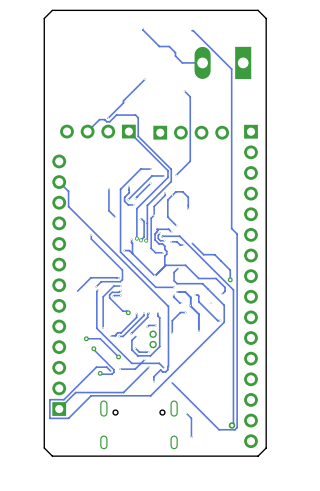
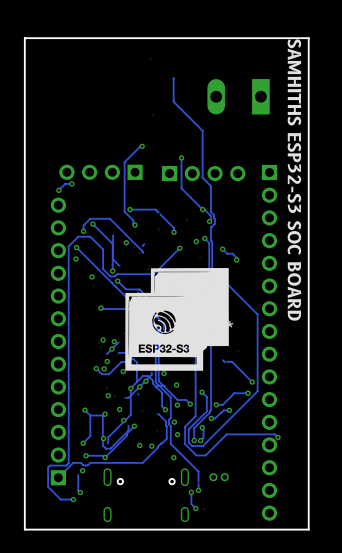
track: (142, 28) (159, 46) (169, 46) (182, 62) (202, 62) -> none
track: (191, 30) (231, 69) (231, 228) (237, 233) (237, 427) (234, 429) (219, 429) (172, 382) -> none
track: (144, 79) (108, 118) -> none
track: (184, 91) (190, 96) -> (173, 78) (173, 101) (202, 130) (202, 134)
via: (184, 91) -> none
track: none -> (142, 146) (124, 162) (124, 211) (135, 225)
via: none -> (142, 146)
via: (108, 118) -> none
track: none -> (181, 157) (181, 188) (211, 216) (209, 221)
via: none -> (181, 157)
track: (87, 131) (99, 119) (109, 121) (116, 115) (135, 115) (138, 117) (138, 136) (171, 169) (171, 181) (147, 205) (146, 240) -> none
track: (128, 131) (167, 170) (167, 177) (136, 208) (136, 238) -> none
track: (190, 136) (190, 161) (176, 175) -> (202, 177) (211, 186) (211, 211) (214, 219) (214, 223) (211, 226) (212, 276) (214, 279) (214, 283) (211, 286) (211, 299) (214, 302) (214, 306) (211, 312) (211, 410) (194, 428) (194, 440)
text: none -> SAMHITHS ESP32-S3 SOC BOARD (294, 179)
track: none -> (71, 183) (65, 183) (58, 190)
via: none -> (71, 183)
via: none -> (58, 190)
track: none -> (130, 209) (155, 209) (174, 228) (174, 232)
via: none -> (130, 209)
via: none -> (202, 209)
track: (151, 169) (140, 169) (120, 189) (120, 252) (155, 287) (174, 287) -> none
track: (164, 175) (151, 175) (128, 199) -> none
via: (164, 175) -> none
via: none -> (209, 221)
track: none -> (93, 224) (112, 243) (112, 271)
via: none -> (93, 224)
via: none -> (135, 225)
track: (59, 182) (68, 191) (68, 198) -> (179, 248) (153, 274) (117, 274) (110, 276) (103, 269) (103, 249) (90, 236) (78, 236) (68, 246)
track: (150, 183) (137, 196) -> none
track: none -> (83, 231) (83, 225) (90, 218) (109, 218) (142, 253)
via: none -> (83, 231)
track: (129, 186) (129, 192) (124, 197) (124, 201) (128, 204) (133, 204) -> none
via: none -> (174, 232)
track: none -> (204, 238) (209, 242) (209, 281)
via: none -> (204, 238)
track: (165, 192) (154, 206) (154, 215) (151, 218) (151, 248) (155, 252) (163, 252) -> none
via: (165, 192) -> none
via: none -> (196, 241)
via: none -> (126, 242)
via: (172, 195) -> none
via: (135, 198) -> none
via: none -> (76, 247)
via: none -> (179, 248)
track: none -> (222, 249) (227, 253) (232, 253) (236, 259)
via: none -> (222, 249)
track: (68, 206) (168, 306) (167, 369) (165, 371) (160, 369) (153, 376) (153, 381) -> (68, 254) (68, 463) (66, 465) (49, 465) (48, 467)
track: (188, 209) (188, 197) (182, 191) (175, 191) (167, 199) (167, 217) (176, 225) -> none
via: none -> (76, 259)
via: none -> (236, 259)
via: (154, 215) -> none
track: (140, 219) (144, 221) (144, 237) (140, 240) -> none
via: none -> (112, 271)
via: none -> (92, 276)
track: none -> (220, 280) (225, 282) (257, 314) (257, 391) (202, 446) (192, 446) (188, 442) (188, 429) (206, 411) (206, 397) (202, 392)
track: none -> (117, 281) (126, 289) (139, 289) (151, 301) (151, 311) (163, 324) (163, 331) (158, 336) (158, 381) (177, 400) (186, 400) (190, 404)
via: none -> (117, 281)
track: (171, 232) (168, 229) (157, 229) (155, 234) (155, 239) (159, 243) (162, 243) (166, 251) (164, 266) -> none
via: (171, 232) -> none
track: (160, 233) (158, 238) (164, 240) -> none
via: (160, 233) -> none
track: (91, 235) (91, 239) (122, 270) (122, 279) (120, 281) (101, 281) (96, 286) -> none
track: (161, 237) (179, 236) (233, 289) (231, 425) -> none
via: (161, 237) -> none
via: (136, 238) -> none
via: (140, 240) -> none
via: (146, 240) -> none
track: (192, 243) (203, 254) (214, 254) (230, 270) (230, 279) -> none
via: (183, 245) -> none
track: (124, 250) (129, 250) (154, 276) (165, 265) (185, 265) (198, 278) (216, 278) (225, 287) (225, 291) (222, 294) -> none
track: none -> (100, 308) (130, 309) (146, 325)
via: none -> (100, 308)
part: none -> (177, 319)
track: (177, 268) (174, 272) (174, 280) (177, 283) (202, 283) (224, 305) (224, 322) (150, 395) (91, 395) (68, 418) (49, 417) -> (73, 499) (60, 499) (48, 486)
track: (118, 278) (90, 277) (77, 291) -> none
via: (230, 279) -> none
via: none -> (103, 340)
via: none -> (114, 341)
track: (120, 286) (113, 286) -> none
via: (120, 286) -> none
via: (174, 287) -> none
track: (98, 290) (96, 328) (131, 363) (159, 363) (164, 368) -> none
track: (120, 290) (112, 292) (109, 297) (122, 311) (128, 312) -> none
track: none -> (186, 347) (195, 356) (195, 416) (185, 426) (185, 444) (196, 455) (205, 455) (226, 434) (274, 434) (278, 437)
track: (176, 291) (185, 291) (190, 297) (190, 306) -> none
via: none -> (111, 349)
track: (173, 294) (181, 303) -> none
via: (173, 294) -> none
track: (194, 295) (198, 296) (198, 301) (217, 320) (220, 320) -> none
via: (194, 295) -> none
track: (103, 296) (103, 327) -> none
track: none -> (222, 360) (232, 361) (252, 382)
via: none -> (107, 361)
via: (181, 303) -> none
track: (190, 305) (198, 314) (198, 331) -> none
via: (190, 305) -> none
track: none -> (96, 368) (101, 374) (109, 374) (121, 362) (126, 362) (129, 358) (133, 359) (136, 362) (136, 382)
via: none -> (96, 368)
via: none -> (104, 368)
via: none -> (123, 371)
via: (128, 312) -> none
track: (148, 312) (147, 314) -> (76, 247) (158, 329) (155, 335) (155, 373)
via: (148, 312) -> none
track: (185, 312) (180, 312) (172, 320) (172, 333) -> none
via: (185, 312) -> none
track: (136, 313) (136, 317) (121, 332) (110, 335) -> none
via: (136, 313) -> none
via: (144, 313) -> none
track: (157, 313) (159, 317) (159, 346) (150, 355) (137, 355) (131, 349) (131, 340) (135, 336) -> none
via: none -> (164, 373)
track: (147, 317) (132, 332) -> (155, 376) (155, 382) (170, 397) (170, 418) (169, 419) (170, 443) (198, 471) (198, 490)
via: (220, 320) -> none
via: none -> (145, 381)
via: none -> (252, 382)
via: none -> (176, 385)
via: (156, 325) -> none
via: none -> (139, 386)
via: (147, 326) -> none
via: none -> (130, 388)
via: none -> (202, 392)
via: (198, 331) -> none
track: none -> (248, 393) (234, 393) (222, 405) (216, 404)
via: none -> (248, 393)
via: (172, 333) -> none
via: none -> (108, 395)
track: (86, 338) (100, 338) (118, 356) -> none
via: (86, 338) -> none
part rotation: 0° (153, 339) -> 90° clockwise (219, 477)
part position: (153, 339) -> (219, 477)
via: none -> (190, 404)
via: none -> (216, 404)
via: none -> (177, 405)
track: none -> (84, 410) (90, 415)
via: none -> (84, 410)
via: none -> (119, 409)
track: none -> (165, 409) (162, 406) (162, 392) (148, 375) (143, 375) (130, 388) (130, 414) (108, 437) (108, 443)
via: none -> (165, 409)
track: none -> (229, 410) (223, 410) (215, 418) (211, 418)
via: none -> (229, 410)
track: (93, 348) (113, 369) (111, 374) (100, 373) -> none
via: (93, 348) -> none
track: (135, 348) (139, 352) (148, 352) -> none
track: none -> (105, 414) (102, 416) (102, 445) (105, 448) (110, 448) (128, 430) (128, 425)
via: none -> (105, 414)
track: none -> (90, 415) (90, 436) (83, 443)
track: none -> (103, 415) (90, 415)
via: none -> (211, 418)
via: none -> (174, 422)
track: (144, 359) (135, 369) (120, 369) -> none
via: (144, 359) -> none
track: none -> (134, 426) (105, 457) (103, 455) (86, 455)
via: none -> (134, 426)
track: none -> (202, 427) (203, 437) (200, 440)
via: none -> (202, 427)
track: (149, 367) (123, 392) (75, 392) (72, 395) -> (158, 413) (166, 421) (166, 438) (142, 462) (90, 462) (87, 465) (73, 462)
via: (164, 368) -> none
via: (120, 369) -> none
via: none -> (177, 434)
track: (110, 371) (106, 367) (96, 367) (63, 399) (49, 399) -> none
via: none -> (278, 437)
via: none -> (194, 440)
via: none -> (200, 440)
via: none -> (83, 443)
via: none -> (139, 445)
via: none -> (151, 446)
via: none -> (86, 455)
via: none -> (105, 457)
via: none -> (173, 457)
via: none -> (82, 470)
track: none -> (78, 475) (78, 490) (80, 492)
track: (186, 413) (191, 418) (191, 437) -> none
via: none -> (198, 490)
via: none -> (80, 492)
track: none -> (191, 492) (191, 504) (195, 508)
via: none -> (191, 492)
via: (231, 425) -> none
via: none -> (73, 499)
via: none -> (195, 508)
board edge: (258, 456) (266, 448) (266, 18) (258, 10) (52, 10) (44, 18) (44, 448) (52, 456) -> (277, 529) (308, 529) (308, 38) (24, 38) (24, 529) (50, 529)

